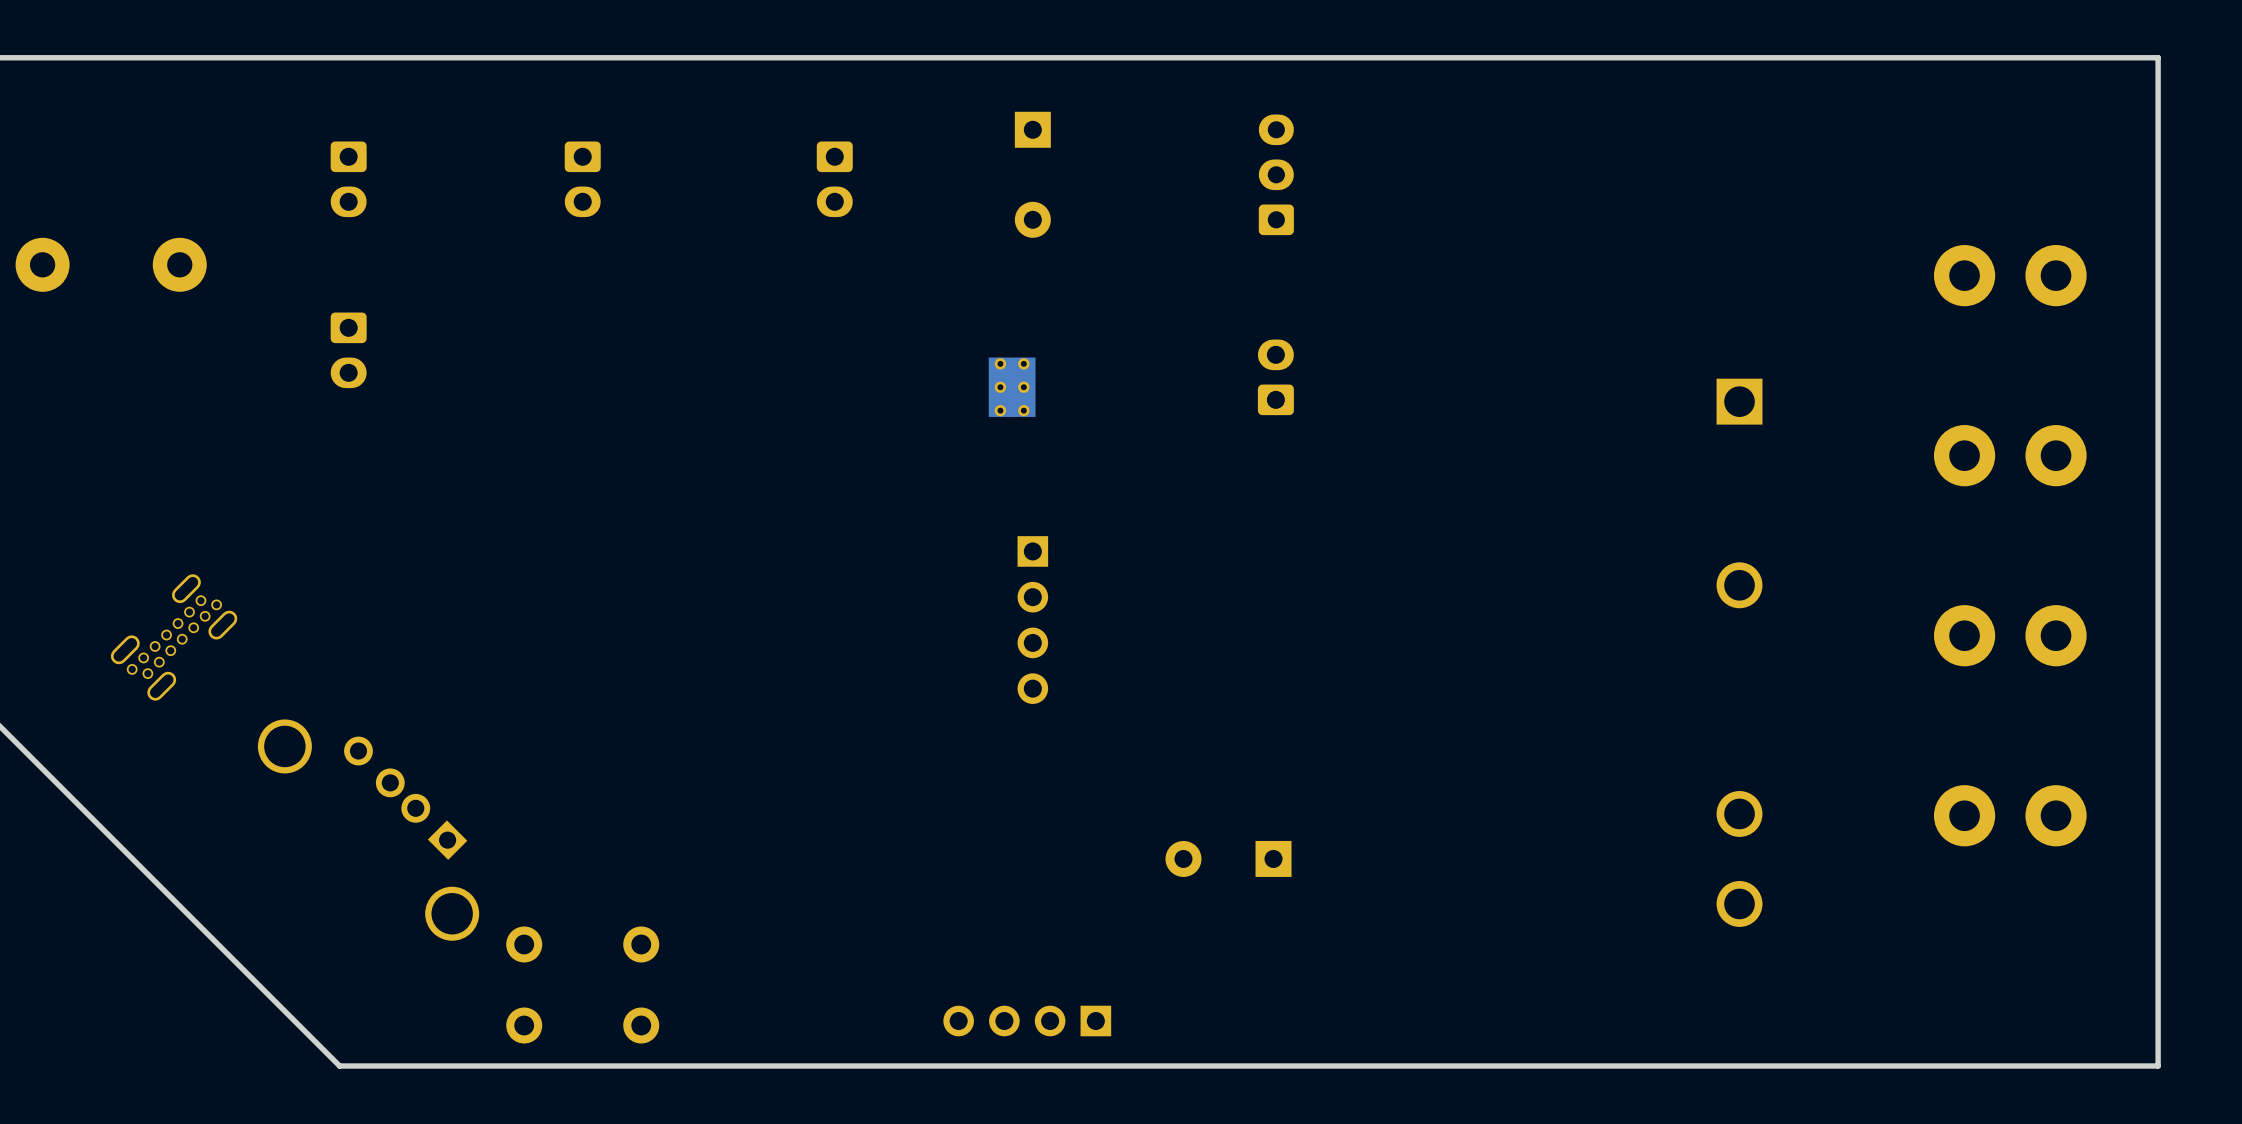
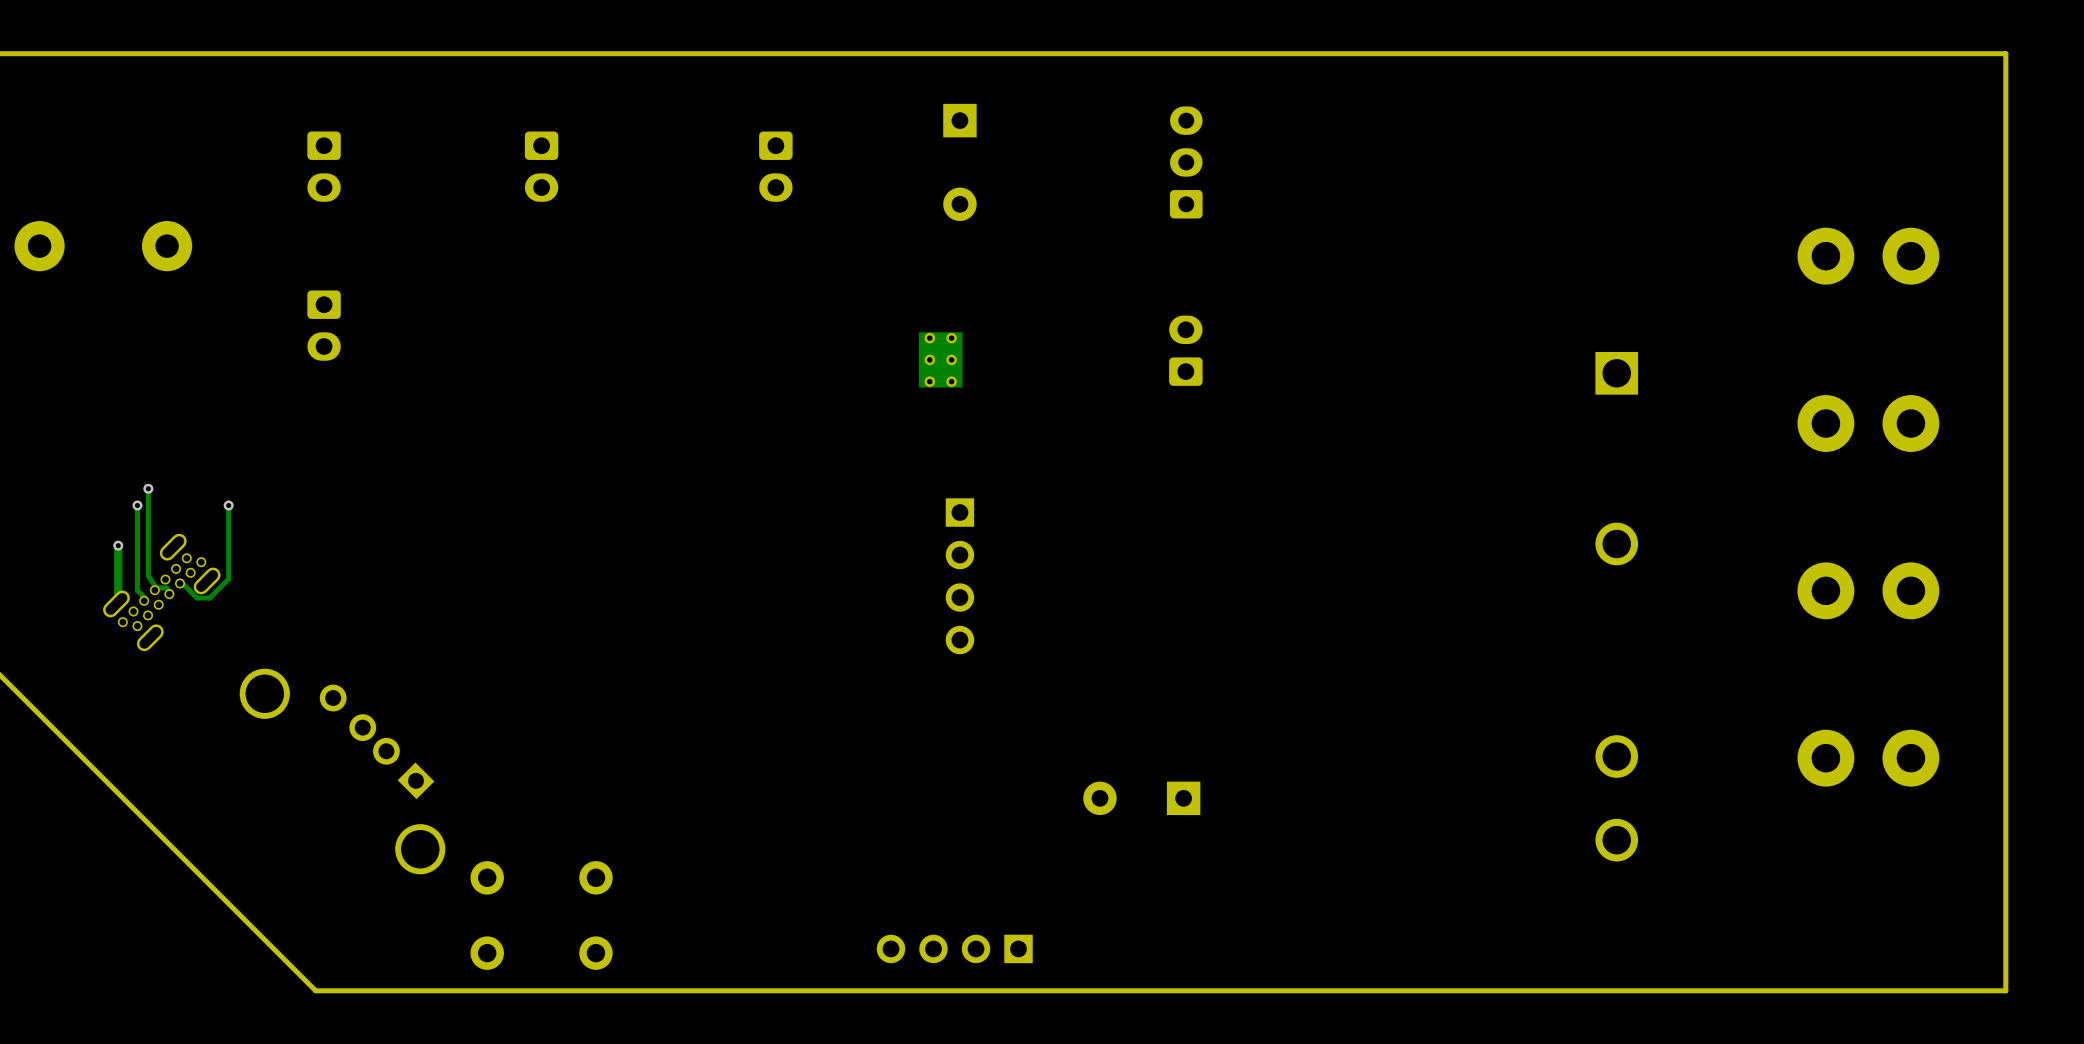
track: none -> (148, 488) (148, 575) (156, 587) (166, 587) (170, 591)
via: none -> (148, 488)
track: none -> (137, 505) (137, 590) (145, 598)
via: none -> (137, 505)
track: none -> (228, 505) (228, 579) (209, 598) (197, 598) (181, 581)
via: none -> (228, 505)
track: none -> (118, 545) (117, 601)
via: none -> (118, 545)

